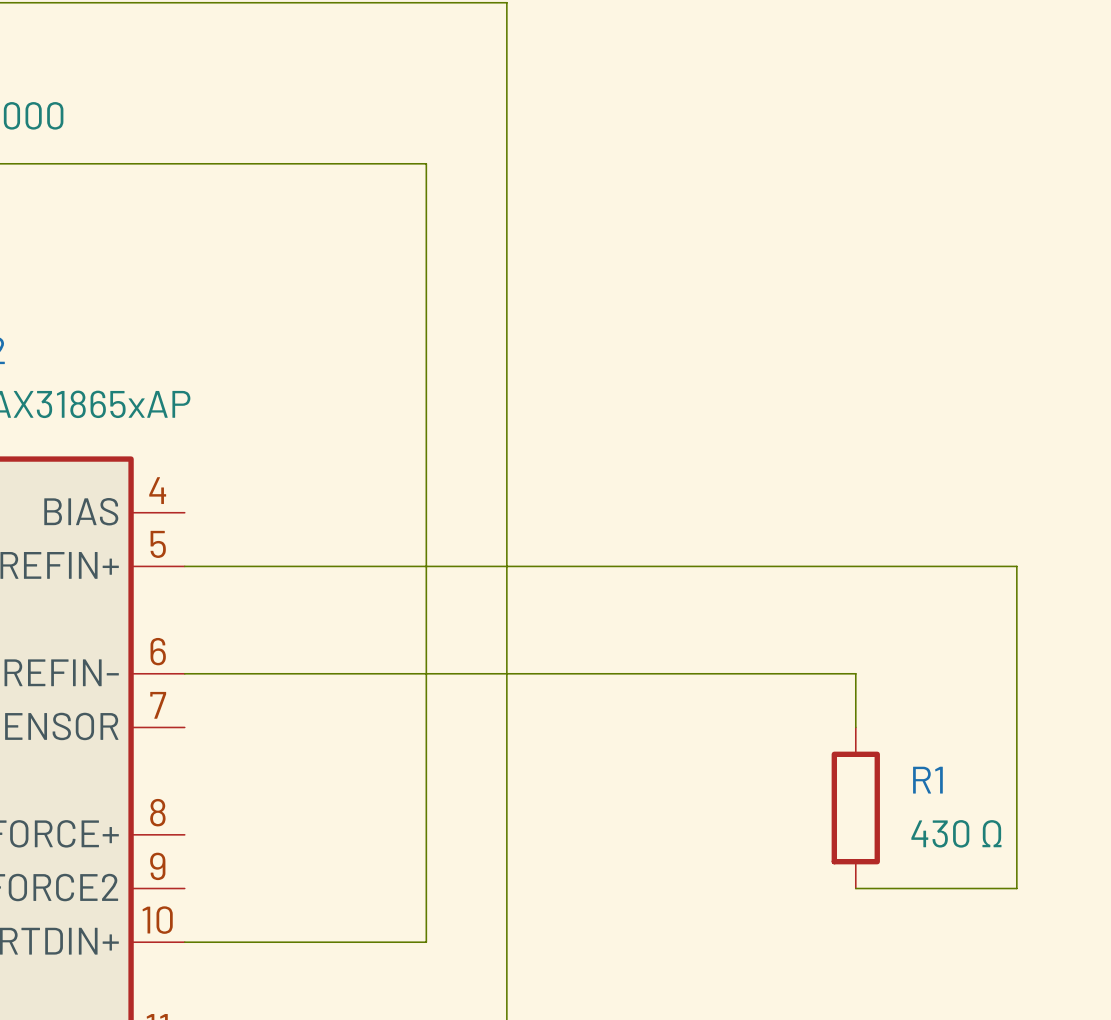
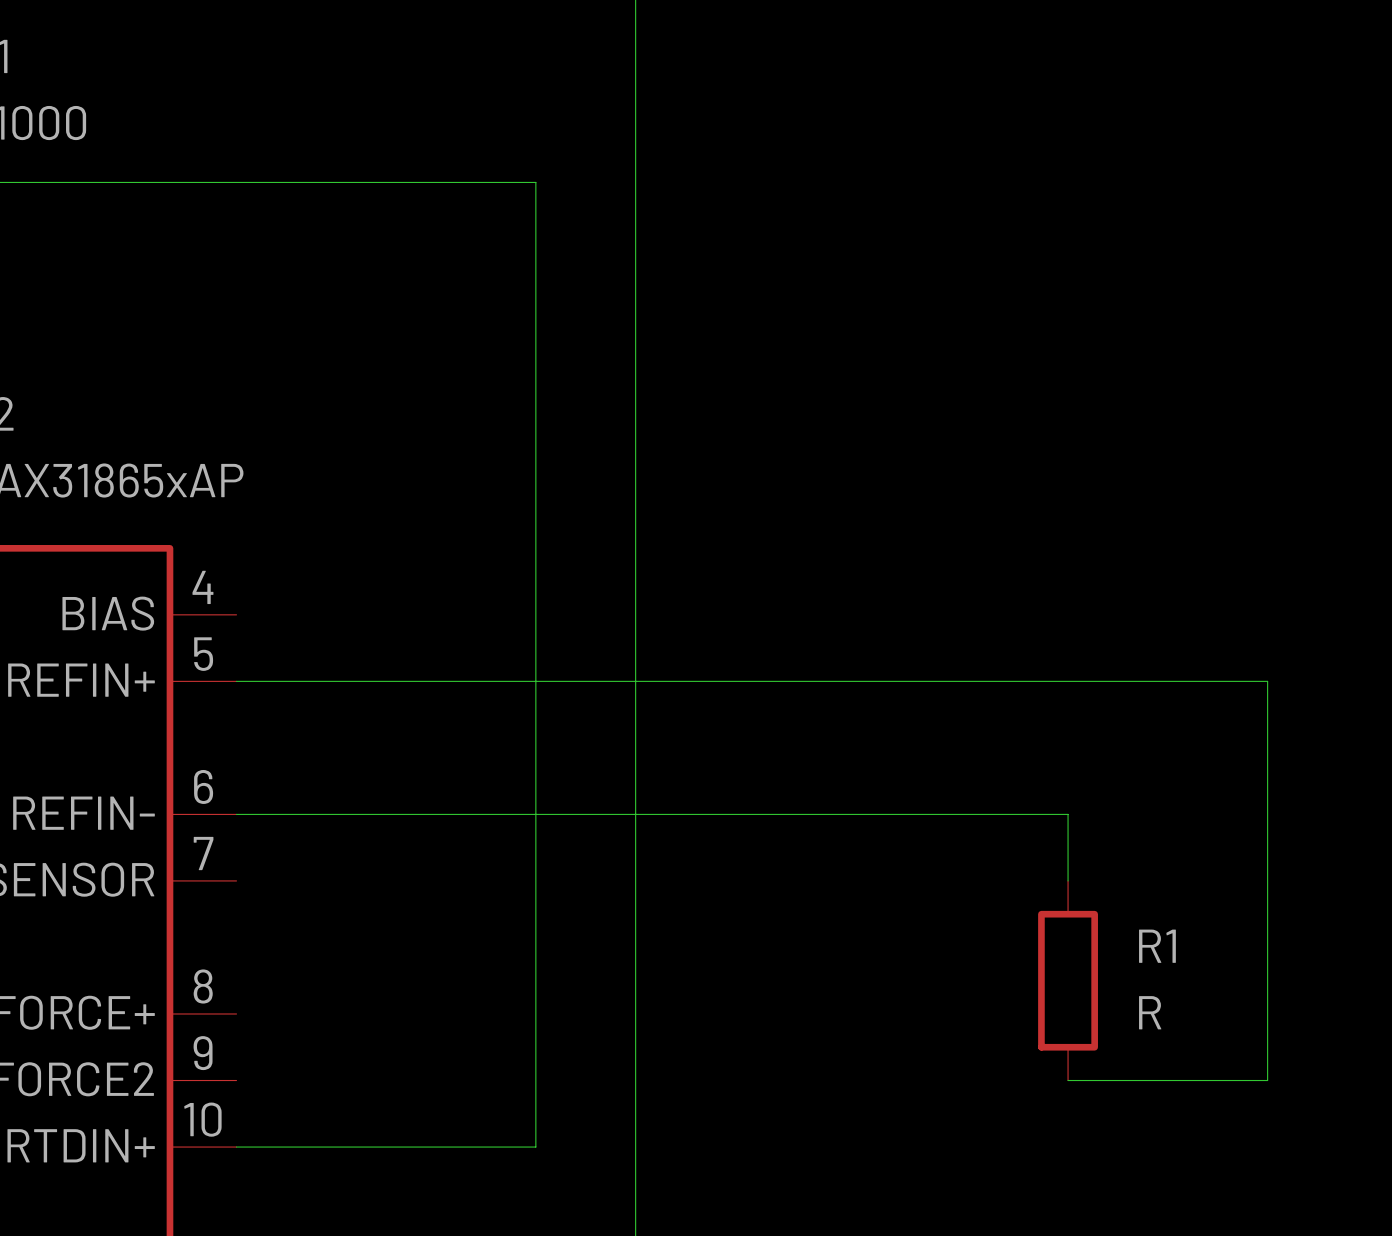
R1 value: 430 Ω (956, 833) -> R (1150, 1012)

